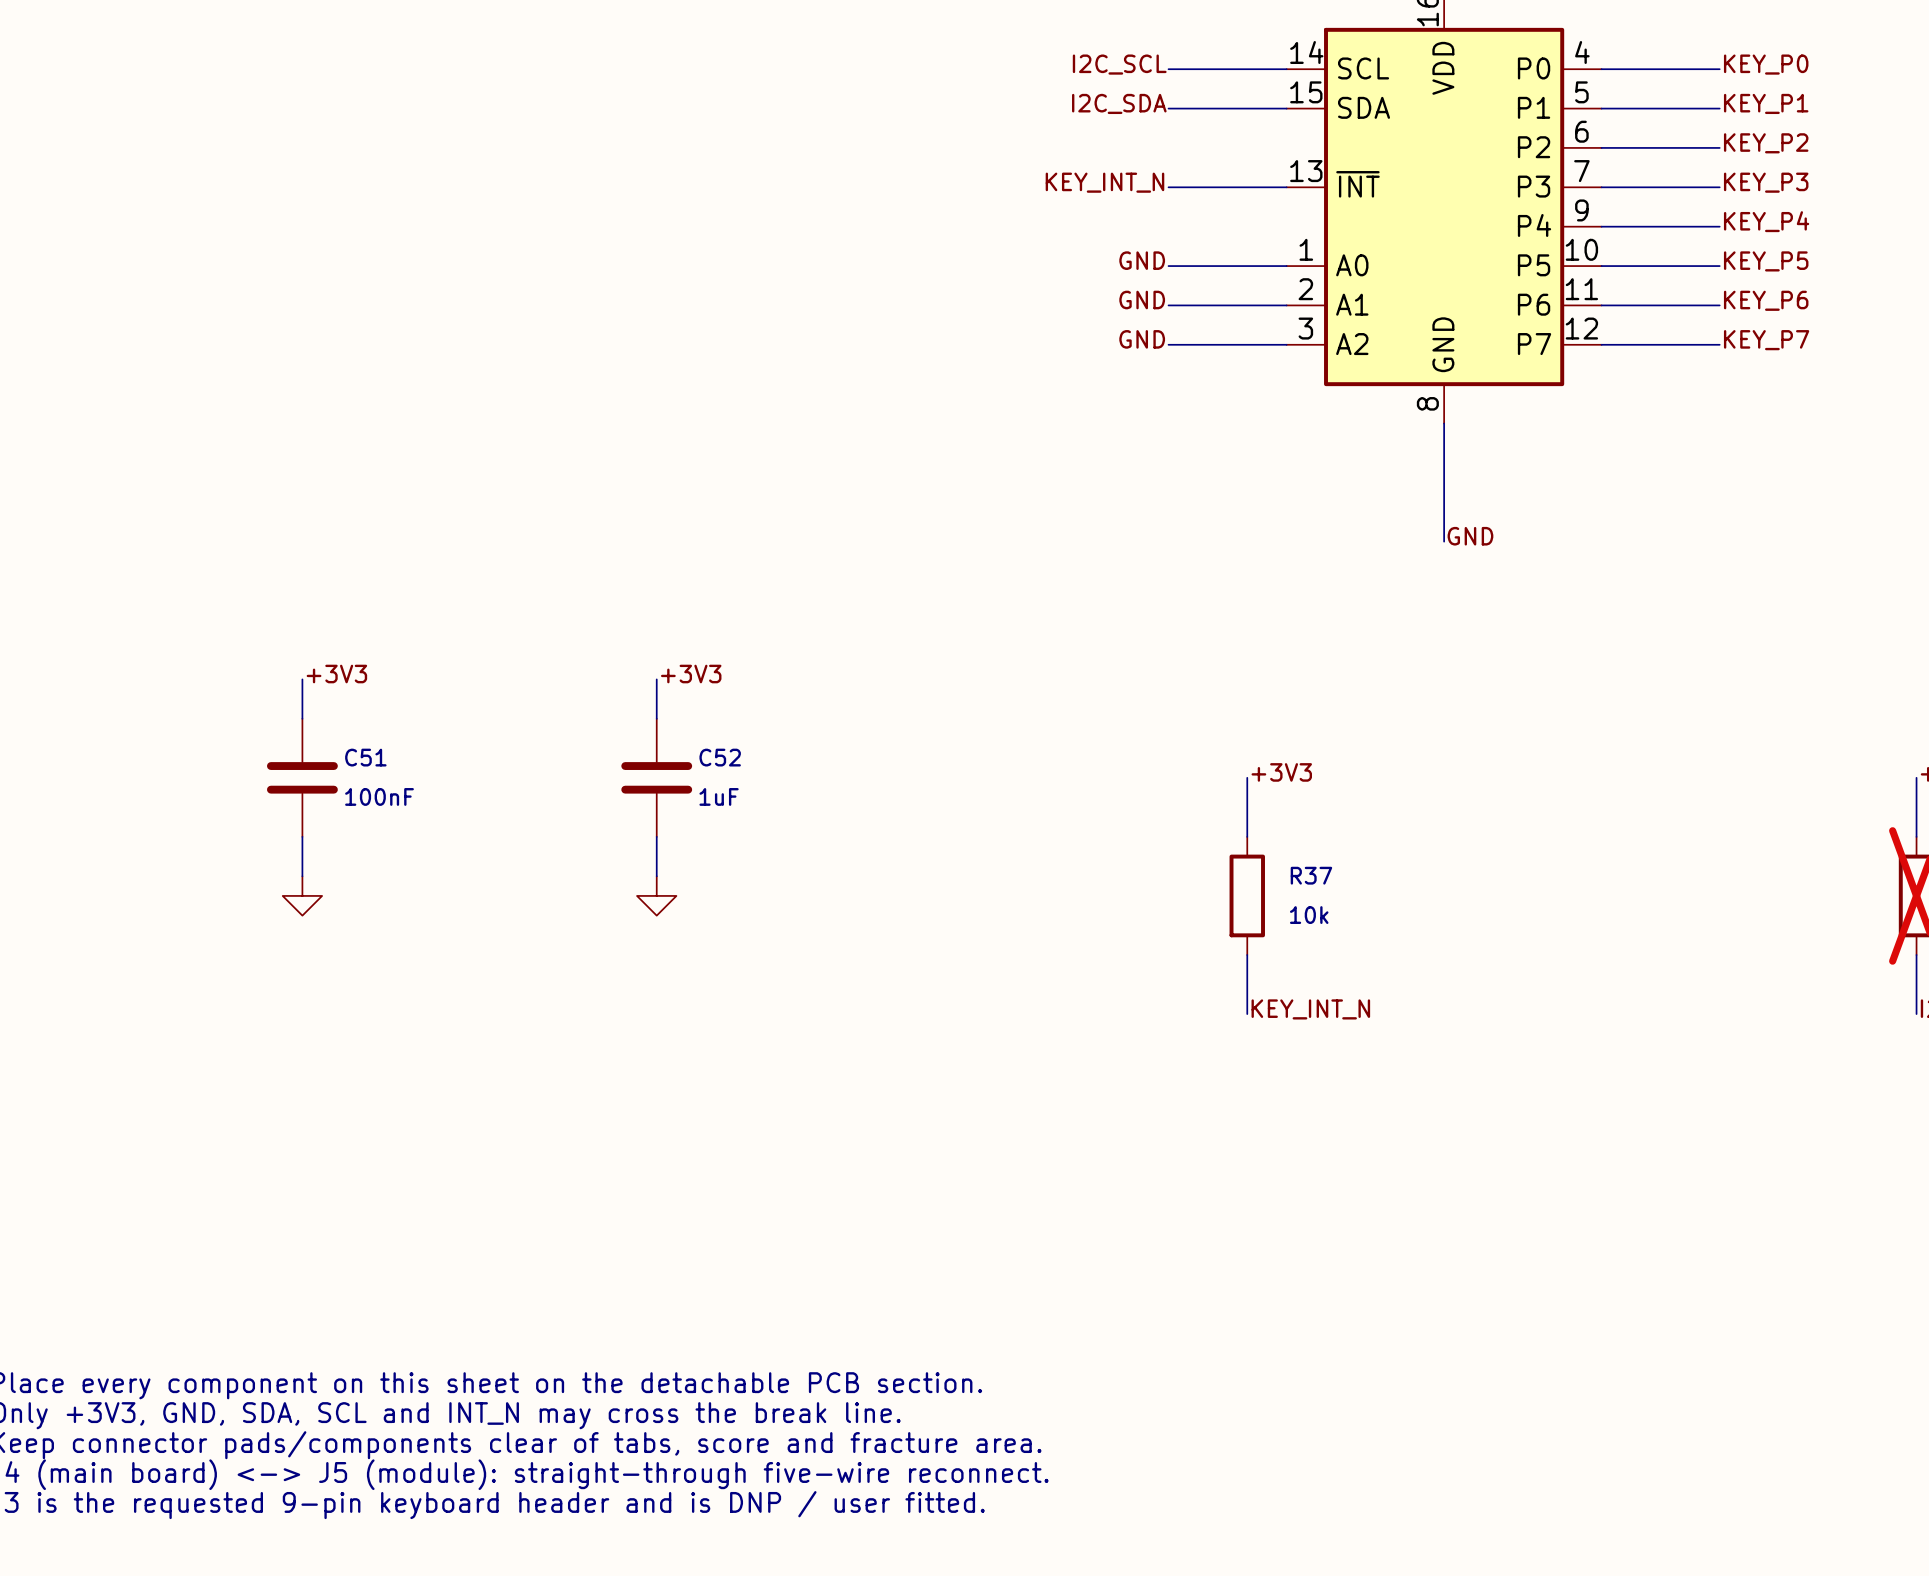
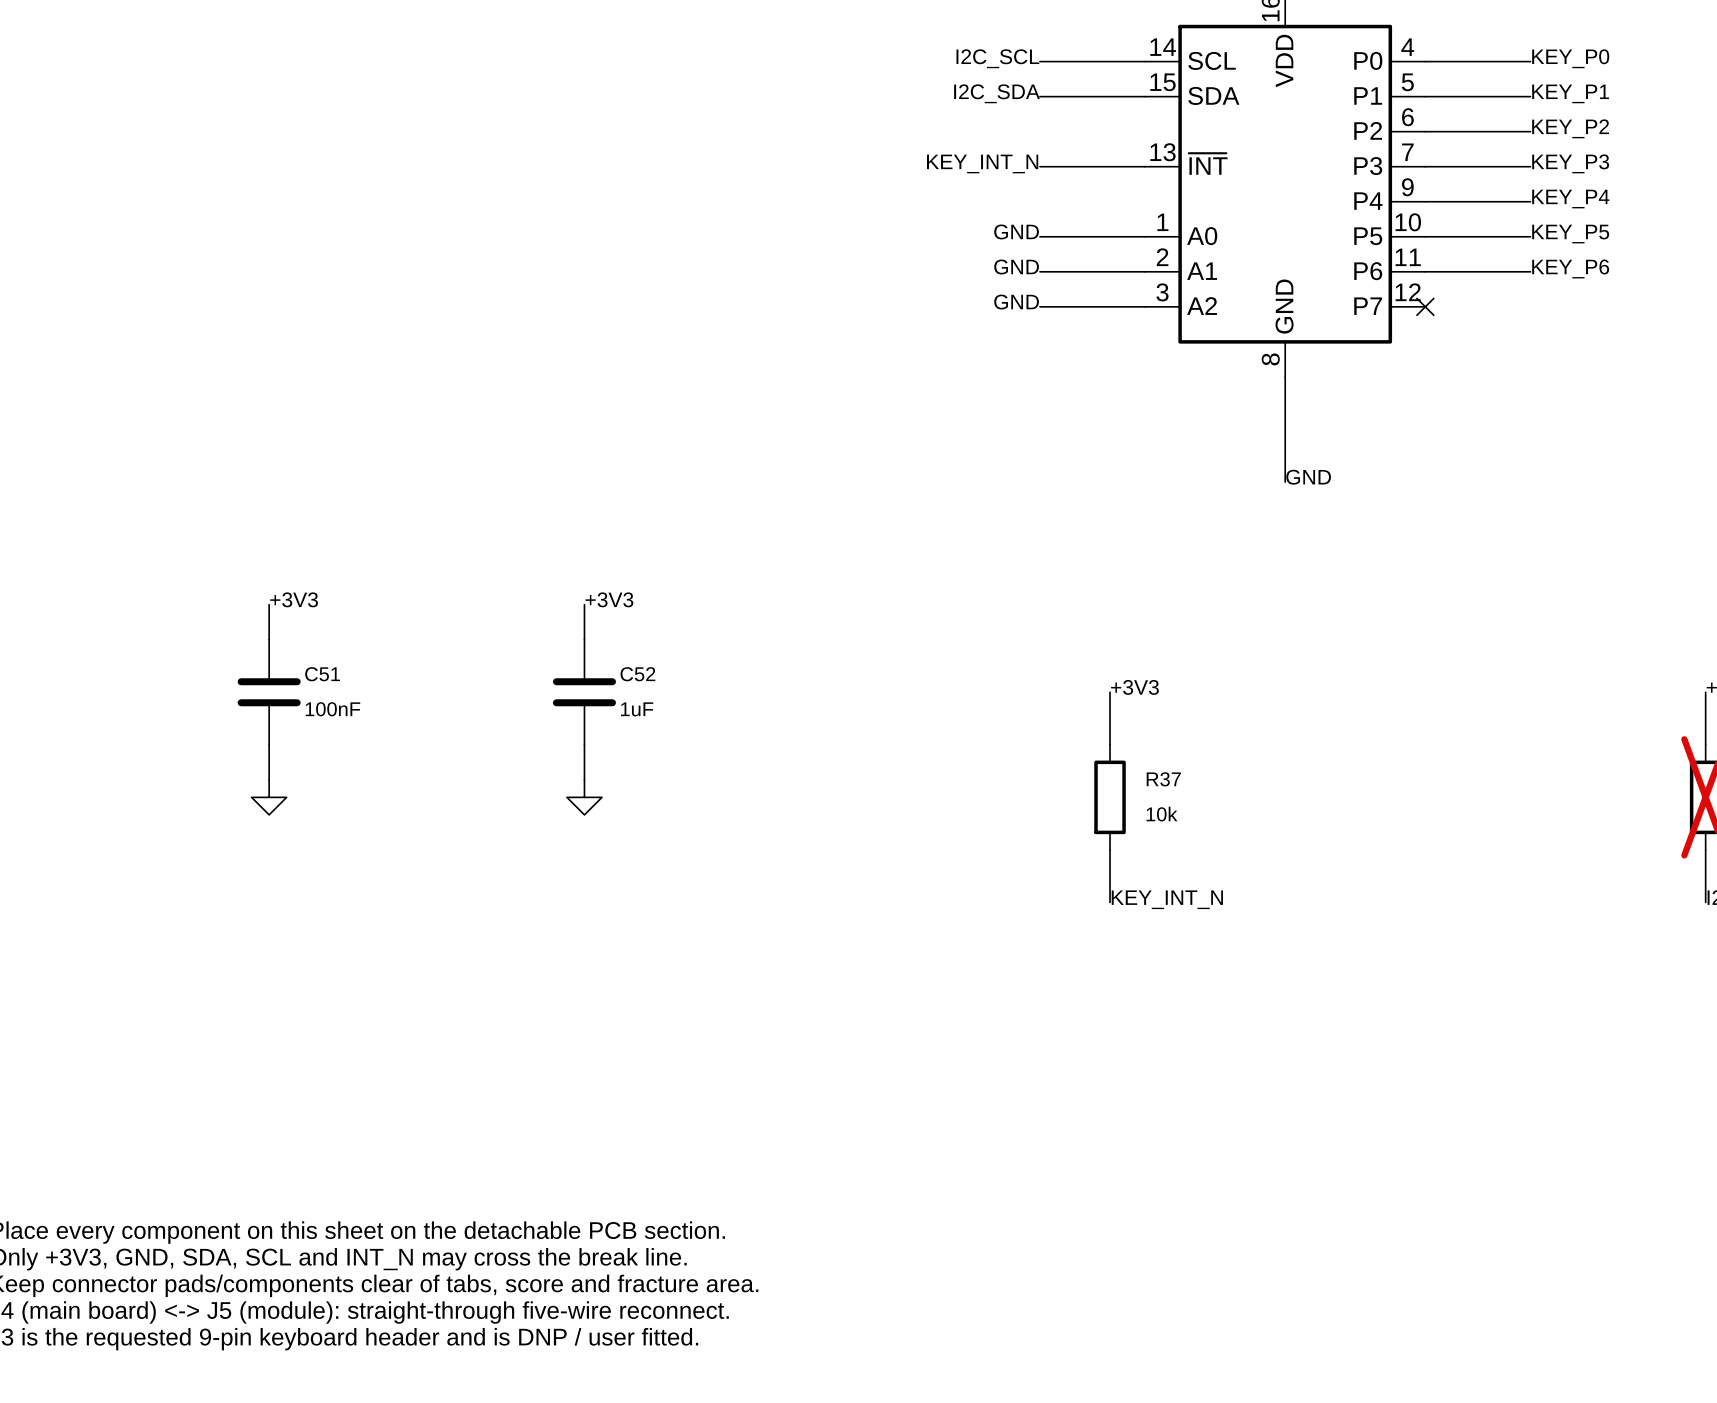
label: KEY_P7 (1766, 340) -> none
wire: (1601, 344) (1719, 344) -> none
no-connect mark: none -> (1425, 306)

